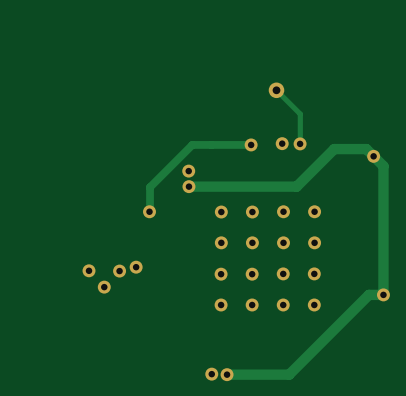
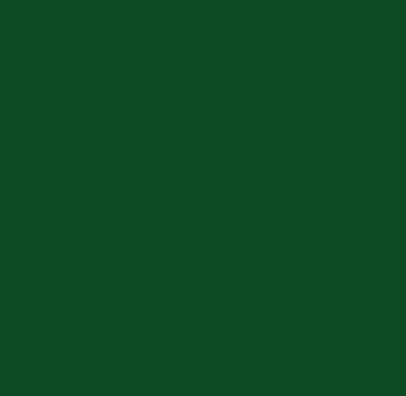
track: (276, 90) (300, 114) (300, 142) -> none
via: (276, 90) -> none
via: (282, 143) -> none
via: (300, 143) -> none
track: (251, 144) (192, 144) (150, 187) (149, 211) -> none
via: (251, 144) -> none
via: (373, 156) -> none
via: (188, 171) -> none
track: (188, 186) (296, 186) (334, 149) (366, 149) (383, 166) (383, 294) (368, 294) (289, 374) (227, 374) -> none
via: (188, 186) -> none
via: (149, 211) -> none
via: (283, 211) -> none
via: (314, 211) -> none
via: (221, 212) -> none
via: (252, 212) -> none
via: (221, 242) -> none
via: (252, 242) -> none
via: (283, 242) -> none
via: (314, 242) -> none
via: (136, 267) -> none
via: (89, 270) -> none
via: (119, 271) -> none
via: (283, 273) -> none
via: (314, 273) -> none
via: (221, 274) -> none
via: (252, 274) -> none
via: (104, 287) -> none
via: (383, 294) -> none
via: (221, 304) -> none
via: (252, 304) -> none
via: (283, 304) -> none
via: (314, 304) -> none
via: (211, 374) -> none
via: (227, 374) -> none

